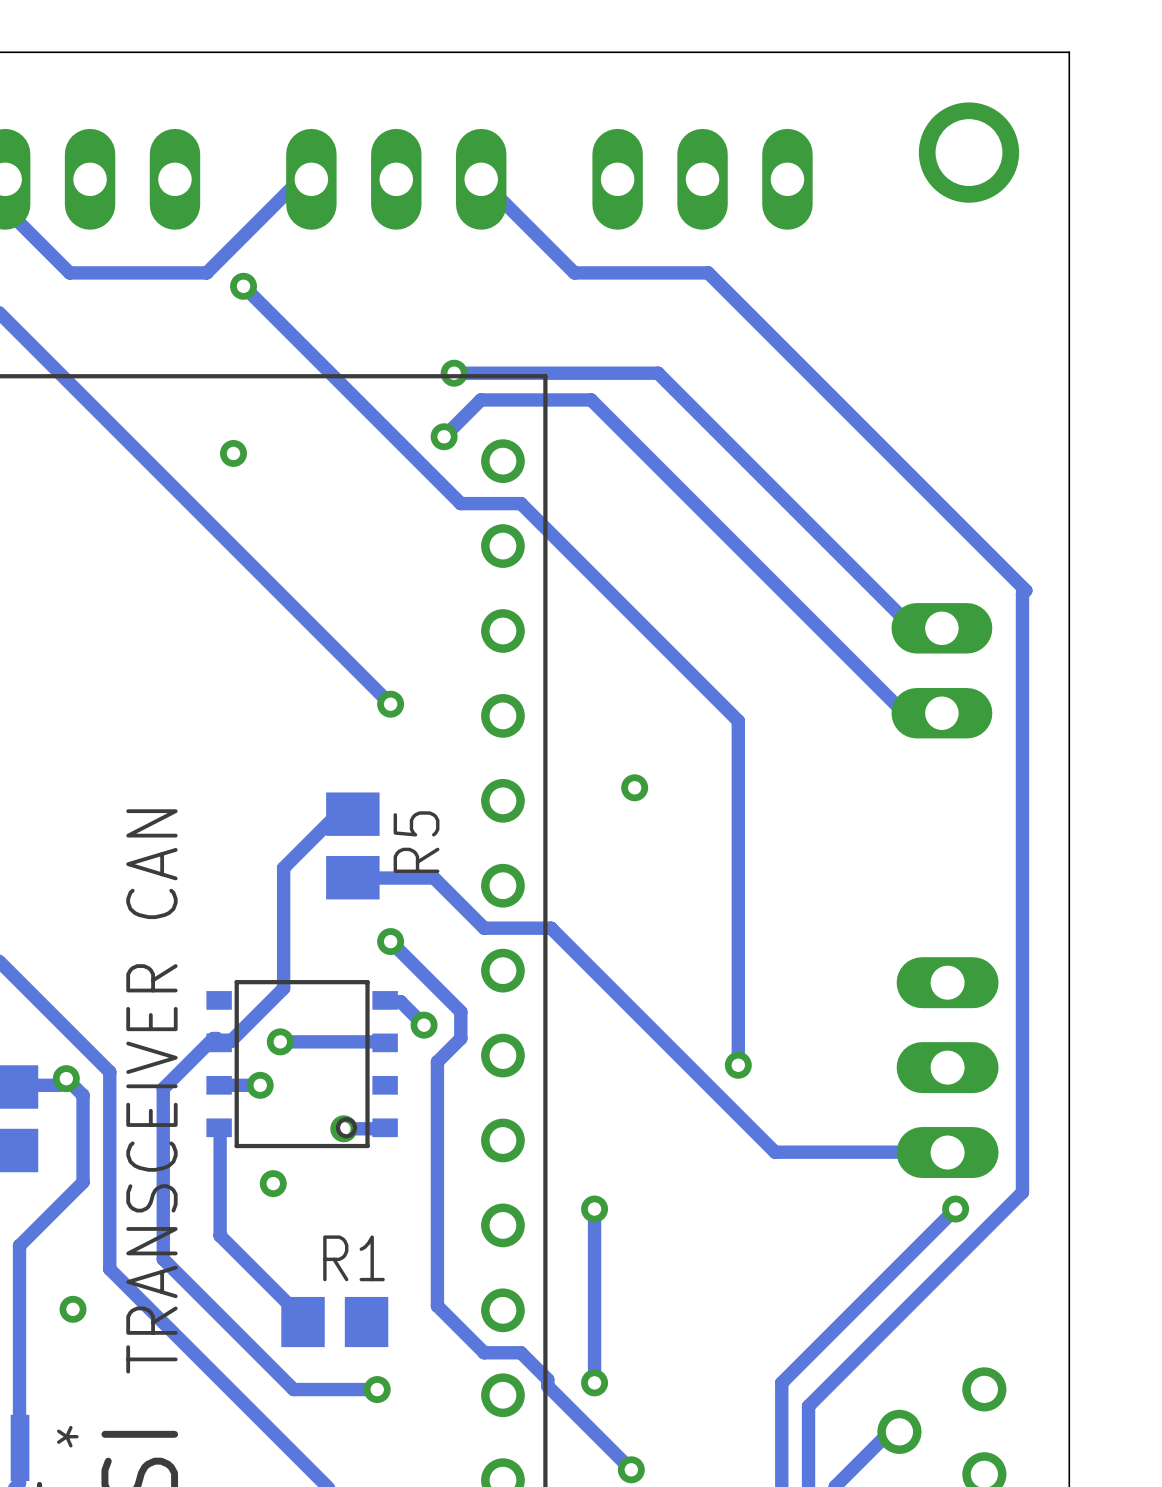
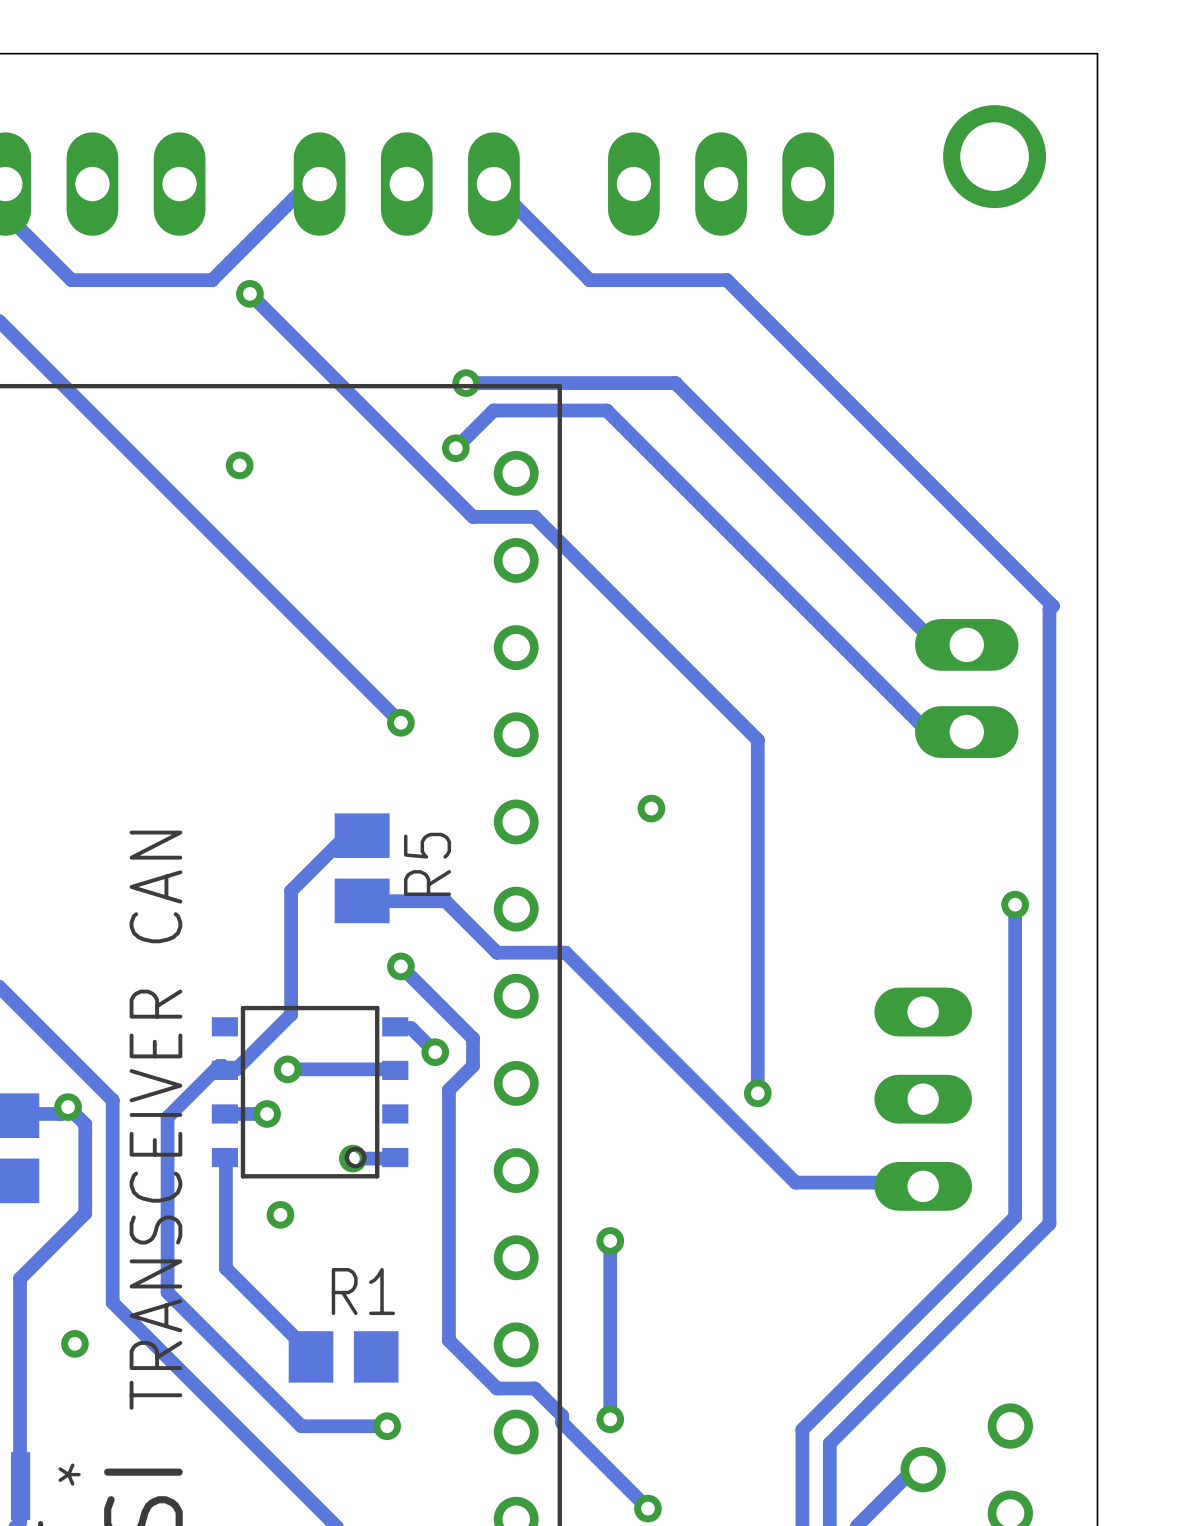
via: none -> (1015, 904)
part: (947, 1067) -> none
part: none -> (923, 1099)
track: (955, 1209) (781, 1382) (781, 1392) -> (1015, 904) (1015, 1216) (802, 1429)
via: (955, 1209) -> none

